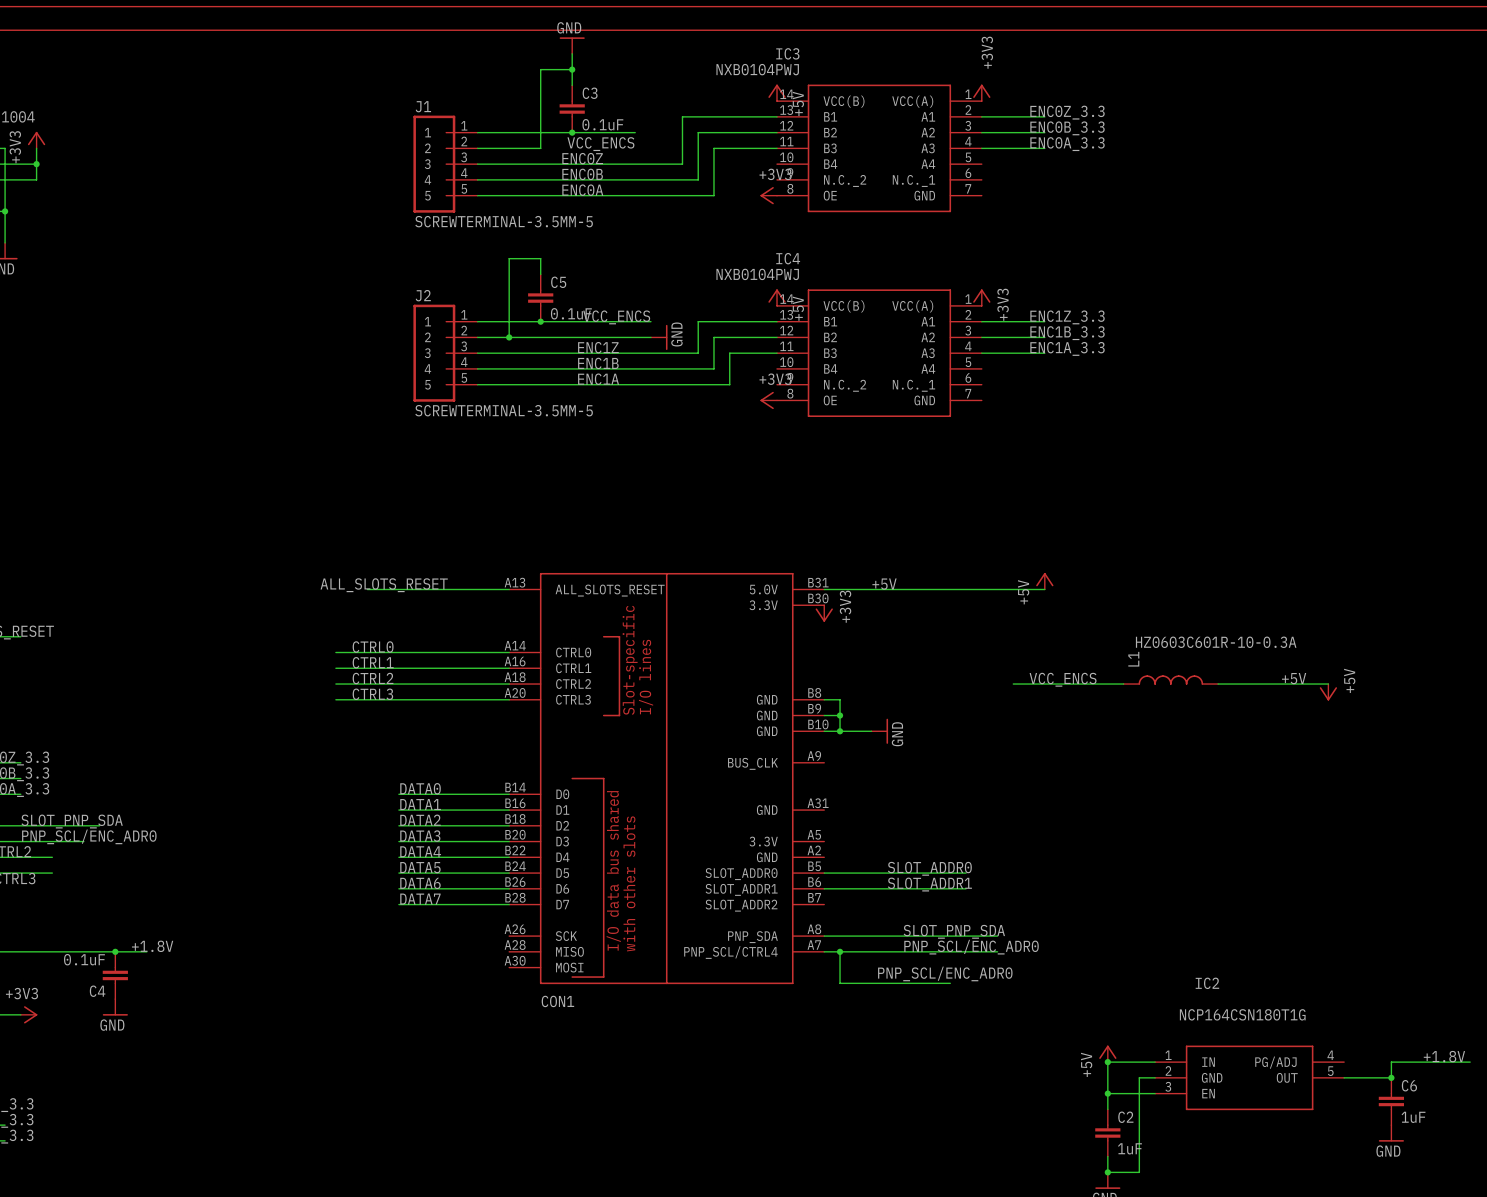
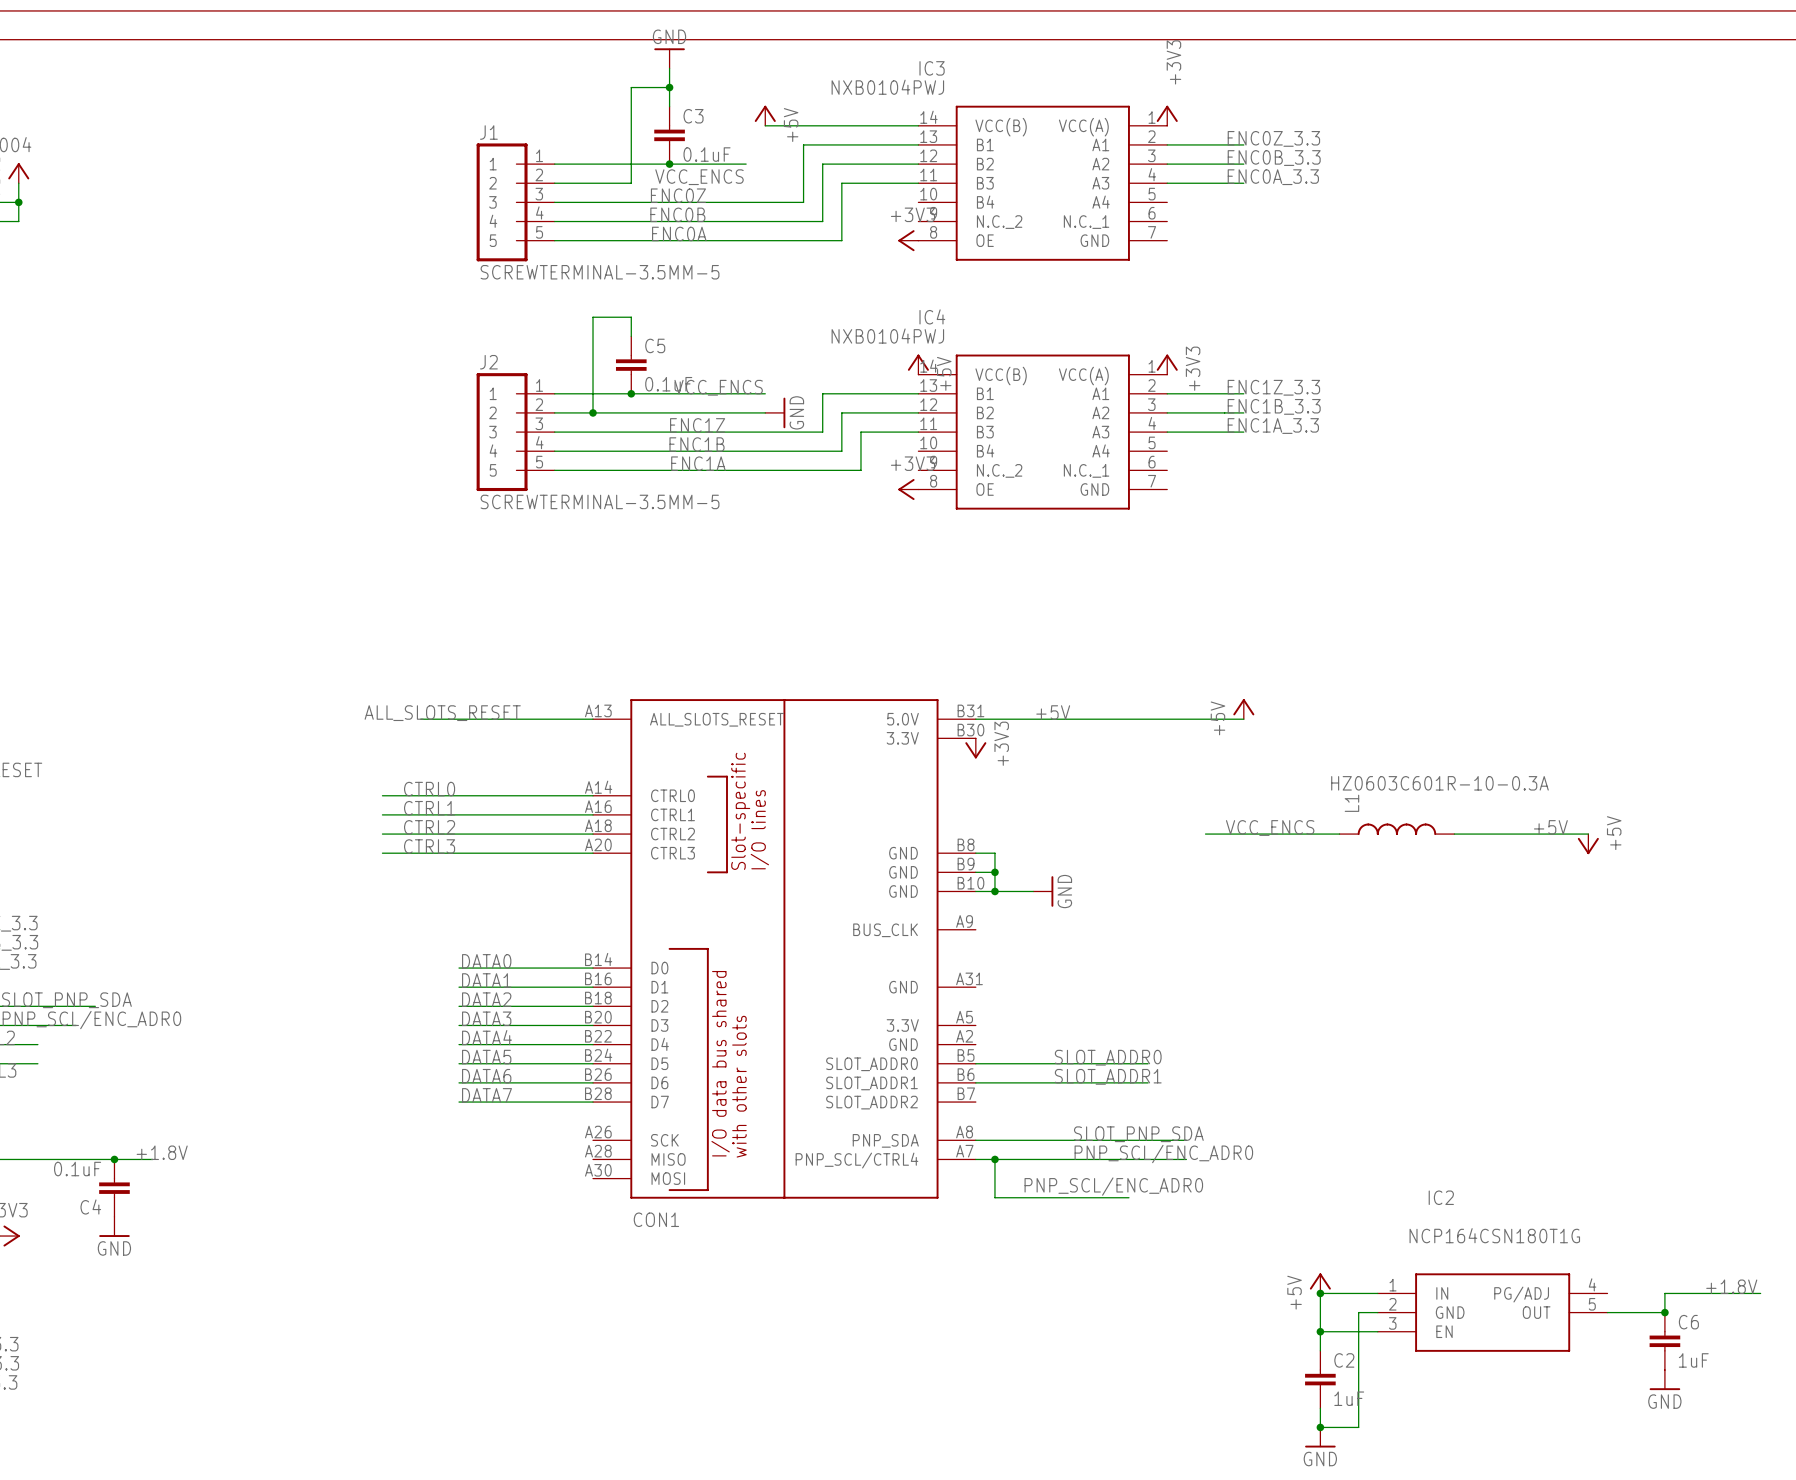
power symbol position: +5V (777, 92) -> +5V (765, 115)
wire: none -> (765, 125) (918, 125)

